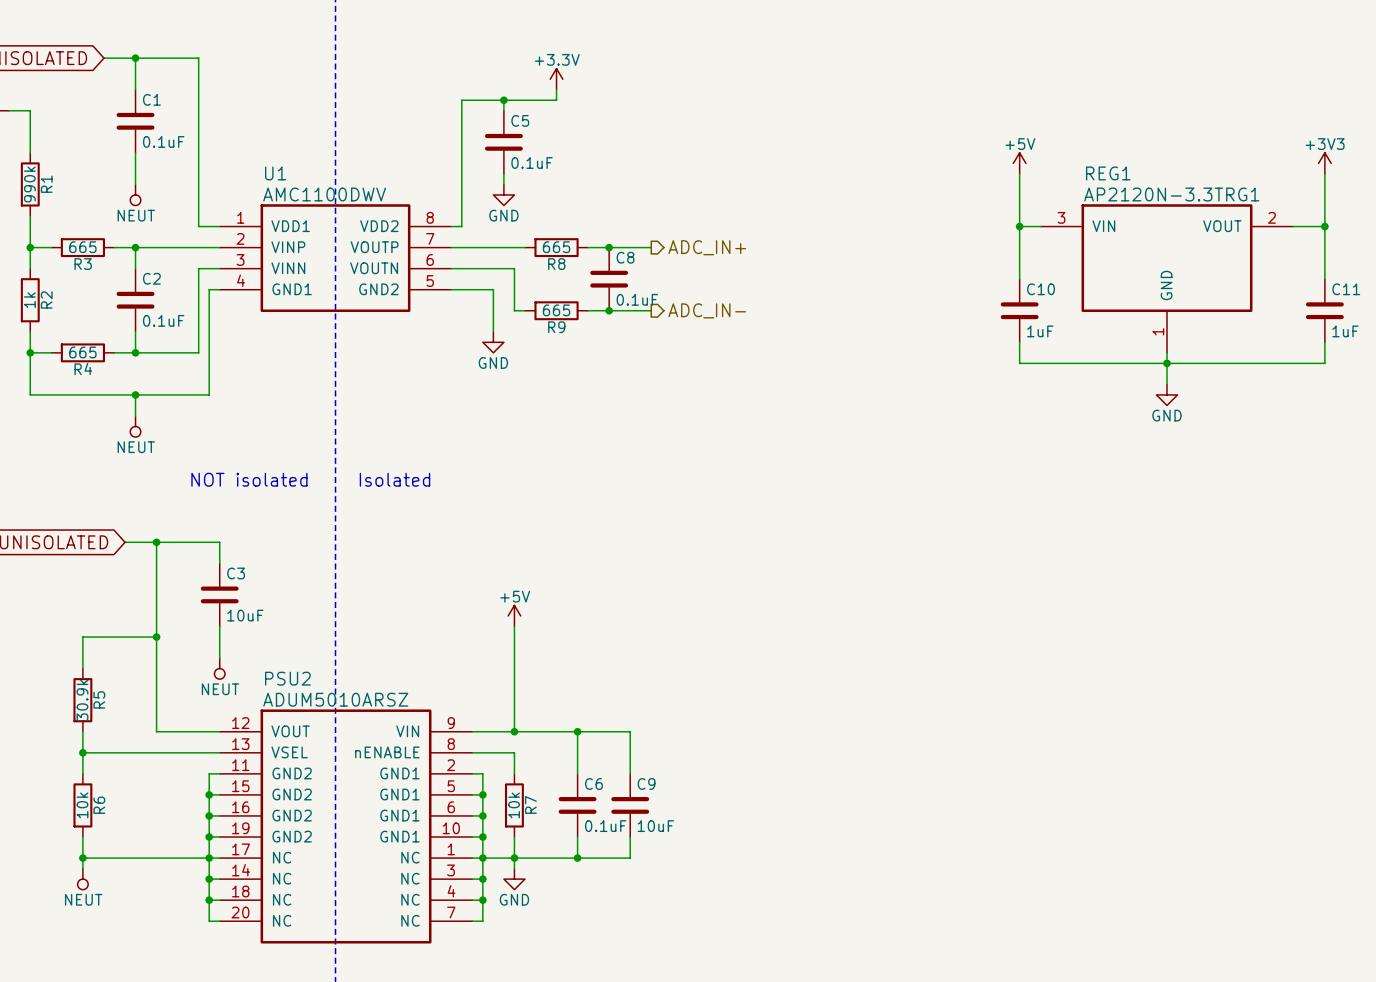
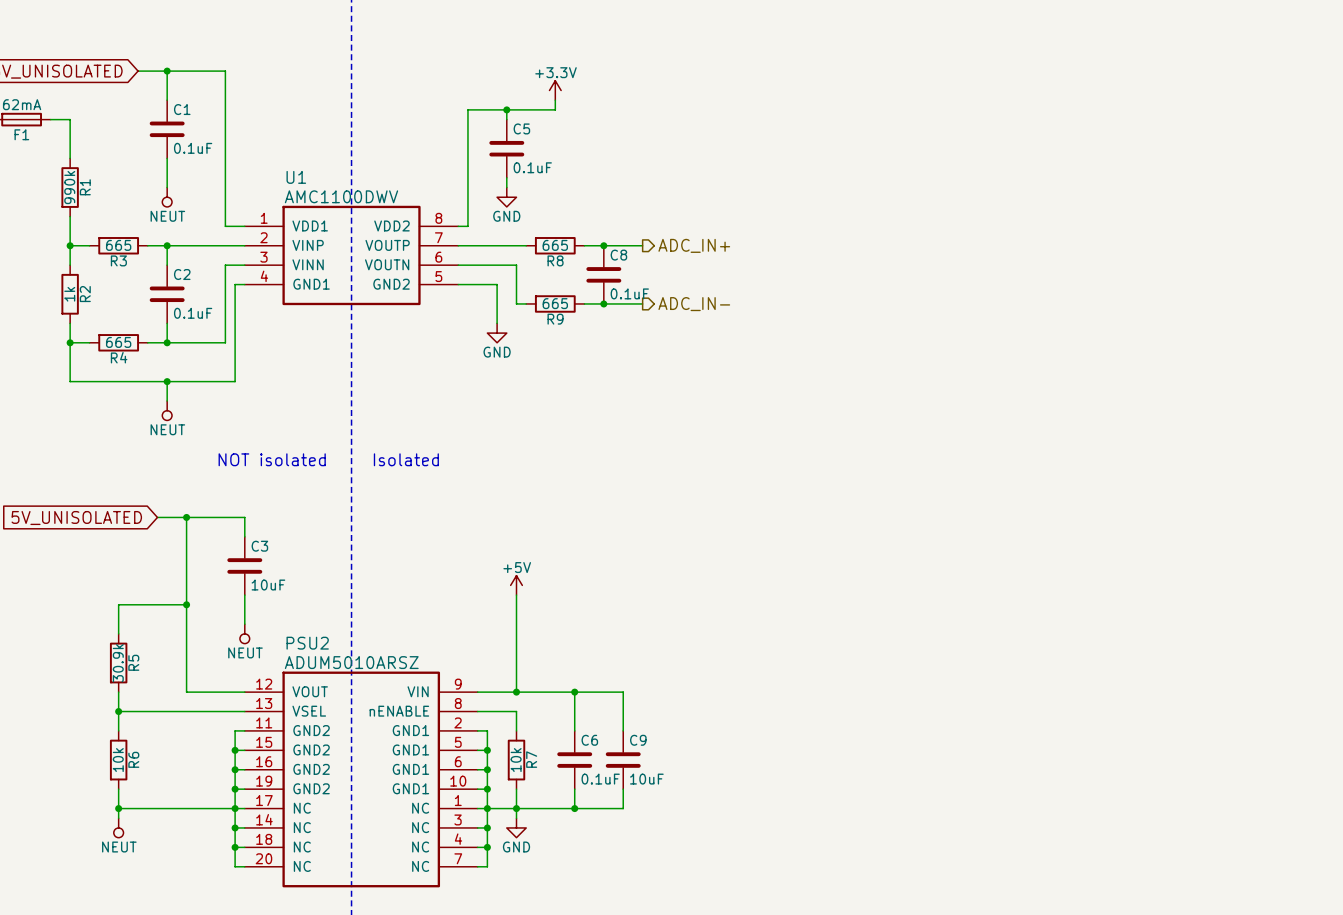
power symbol: +5V (1019, 163) -> none
power symbol: +3V3 (1324, 163) -> none
wire: (1019, 173) (1019, 279) -> none
wire: (1324, 173) (1324, 279) -> none
wire: (1019, 226) (1040, 226) -> none
junction: (1019, 226) -> none
wire: (1293, 226) (1324, 226) -> none
junction: (1324, 226) -> none
REG1: AP2120N-3.3TRG1 (1167, 278) -> none
C10: 1uF (1019, 310) -> none
C11: 1uF (1324, 310) -> none
wire: (1019, 342) (1019, 363) (1324, 363) (1324, 342) -> none
wire: (1167, 352) (1167, 384) -> none
junction: (1167, 363) -> none
power symbol: GND (1167, 394) -> none

